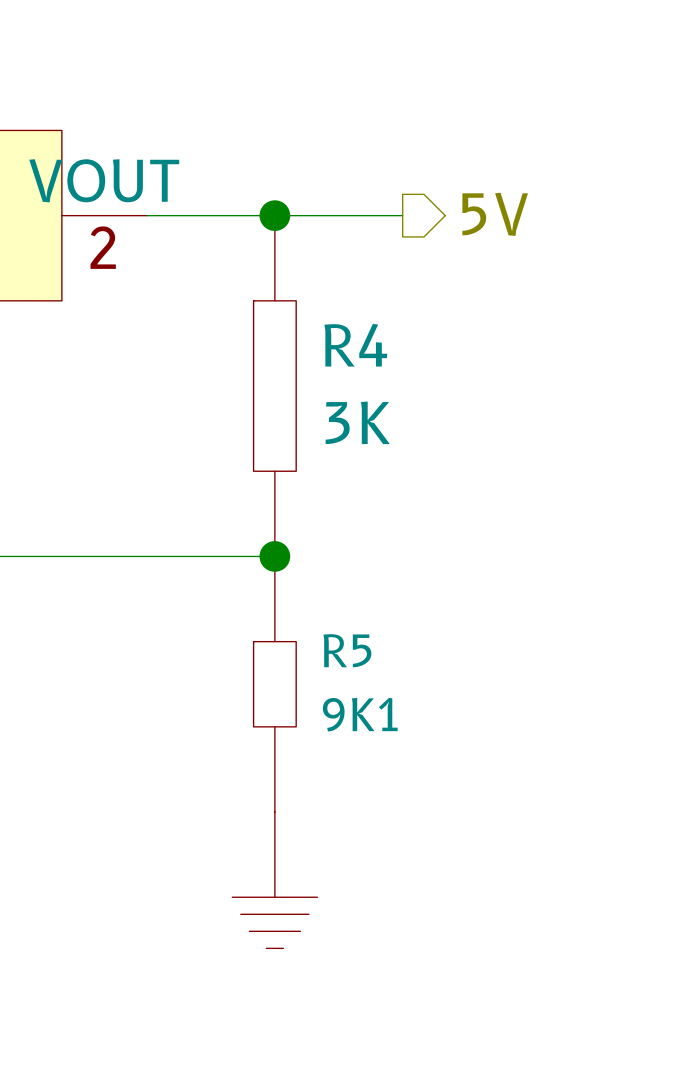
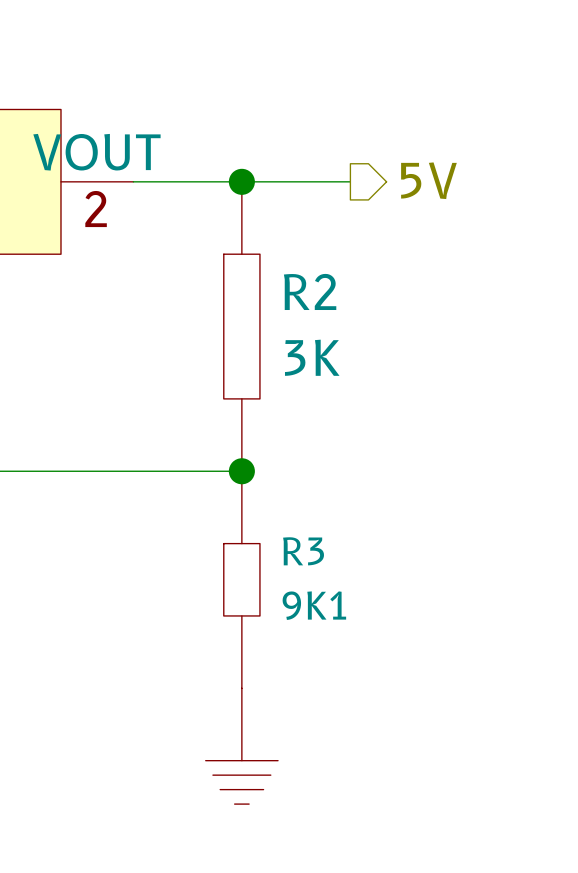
R4 name: R4 (355, 345) -> R2 (310, 291)
R5 name: R5 (347, 650) -> R3 (303, 551)

